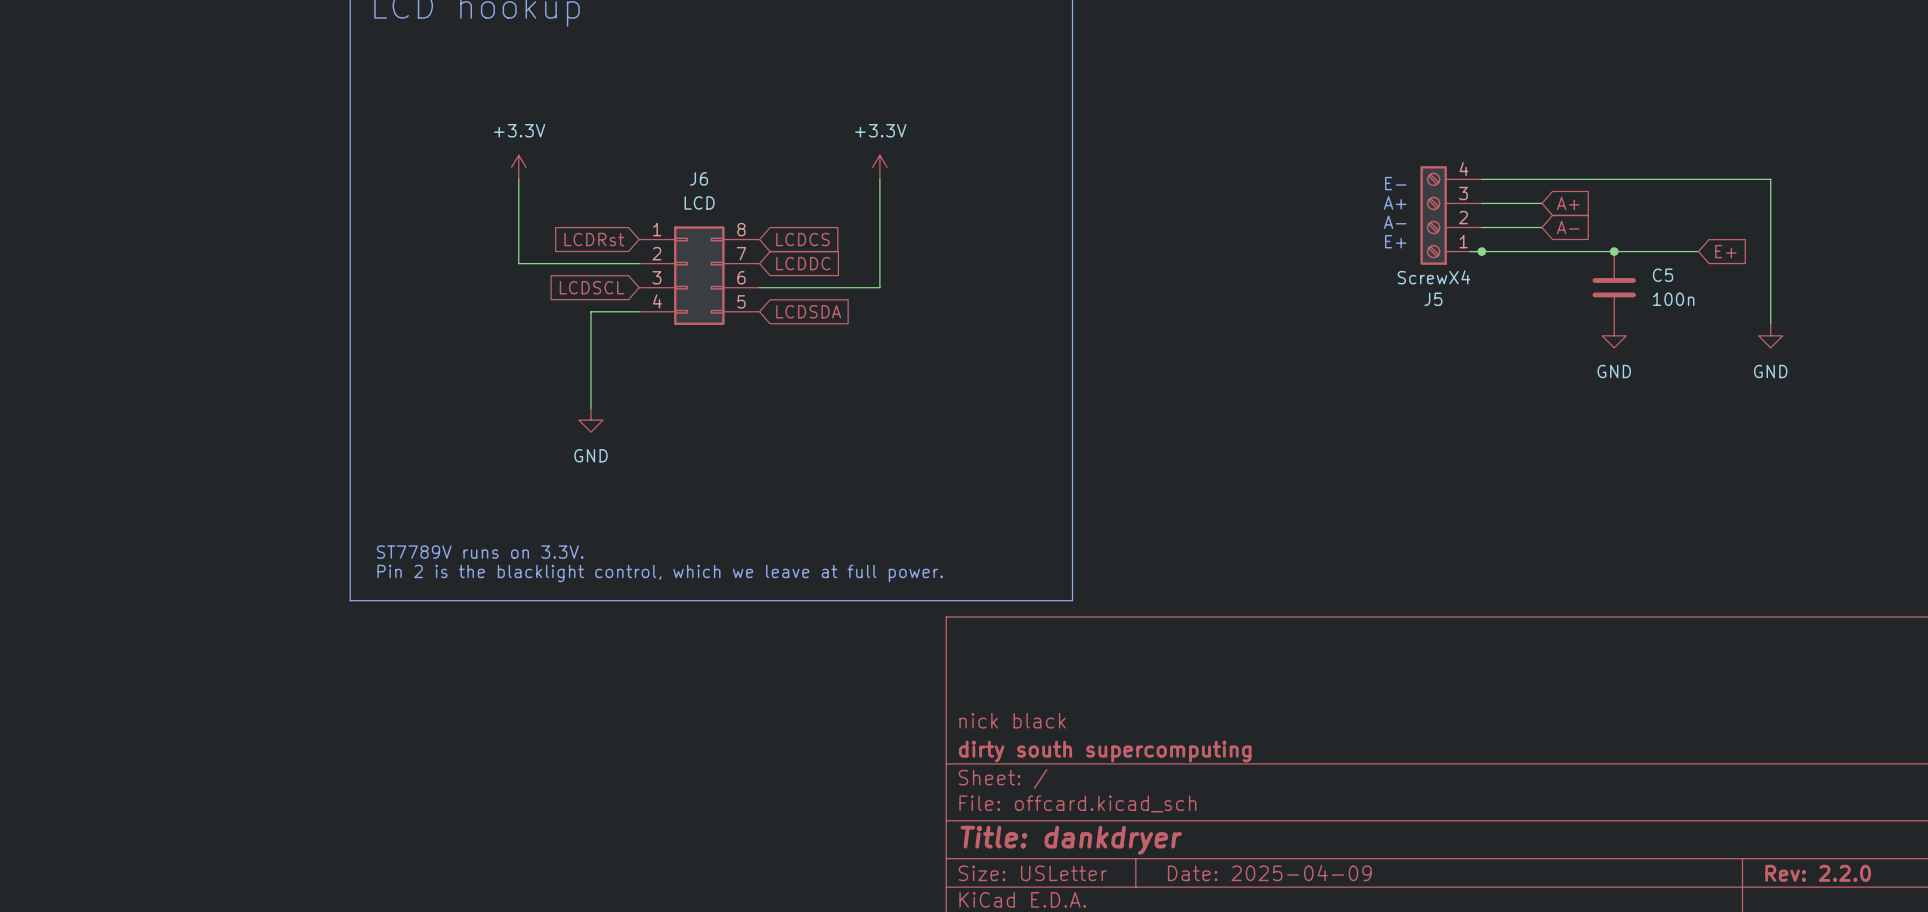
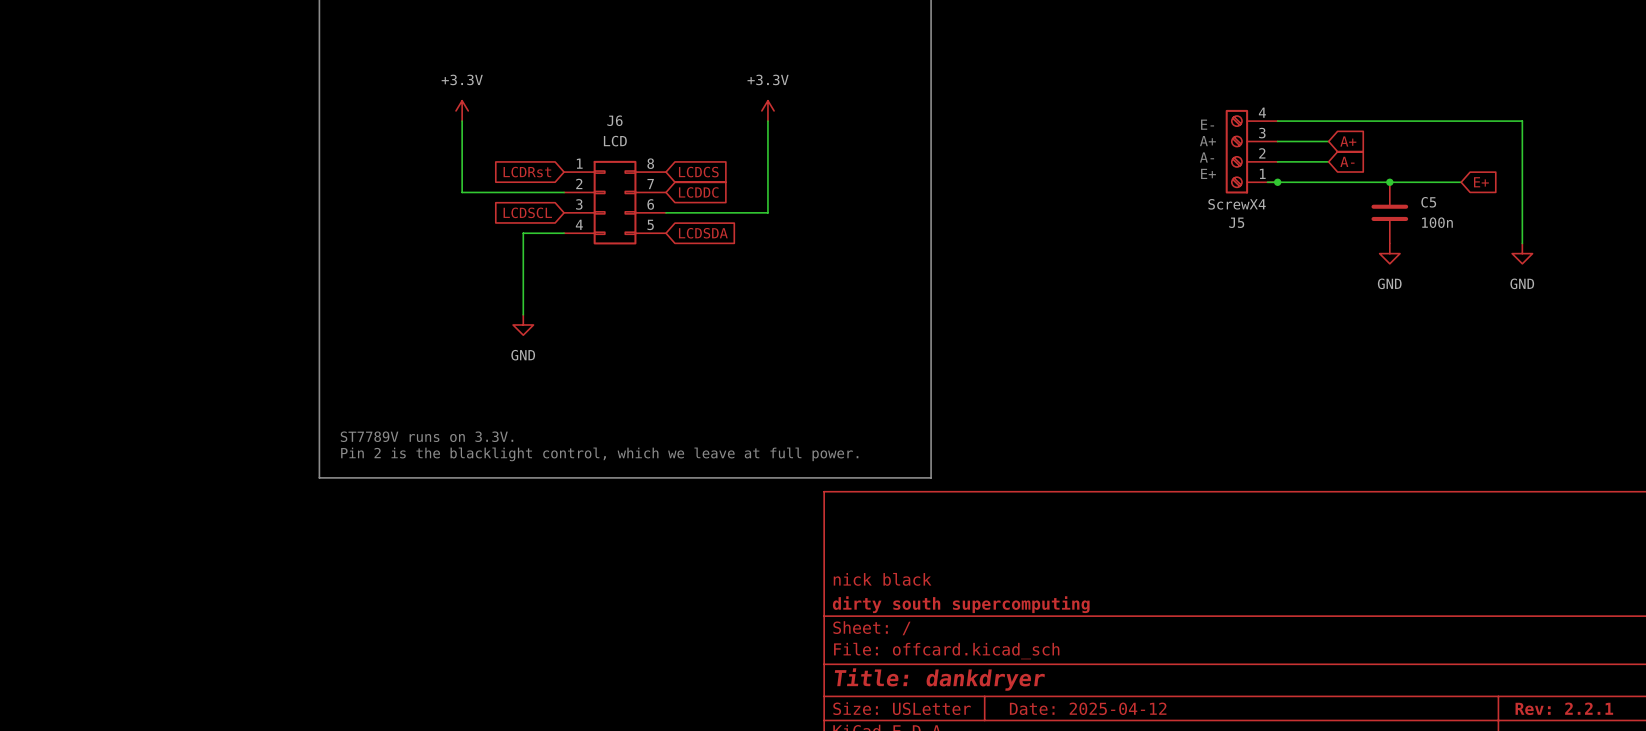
title block: Date: 2025-04-09 (1269, 873) -> Date: 2025-04-12 (1088, 708)
title block: Rev: 2.2.0 (1818, 873) -> Rev: 2.2.1 (1564, 708)

